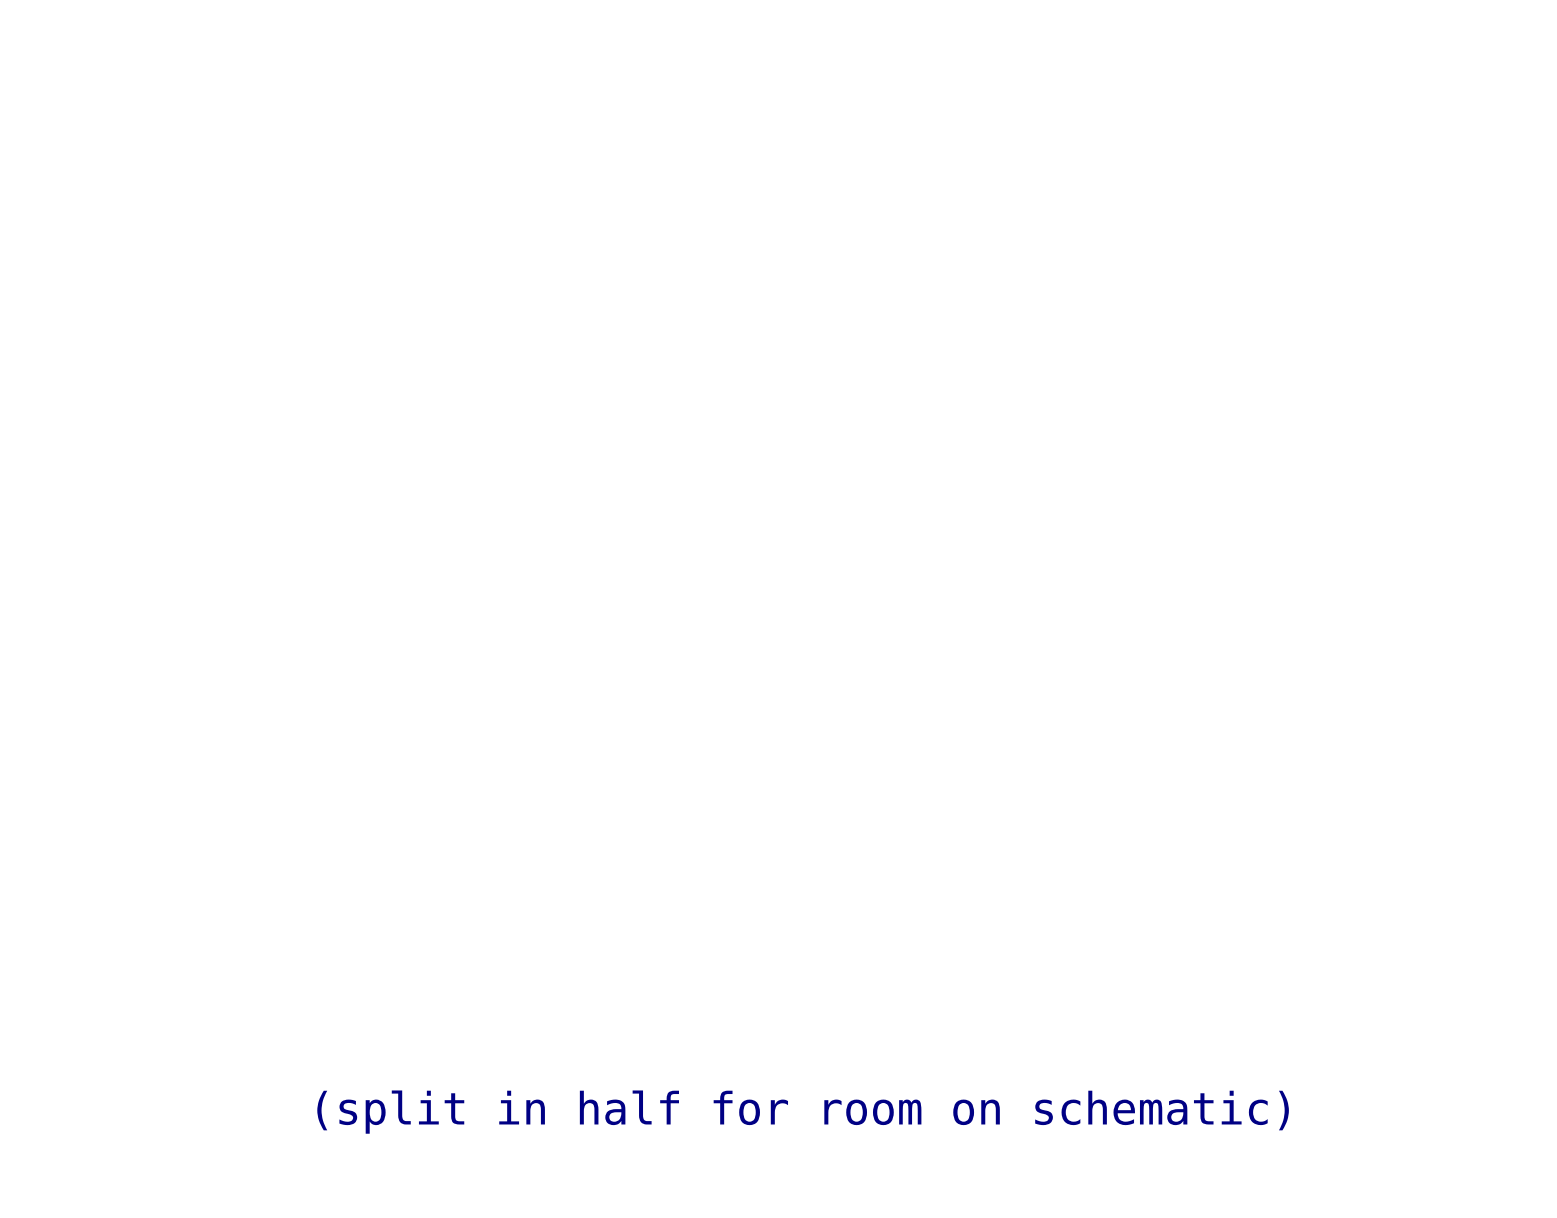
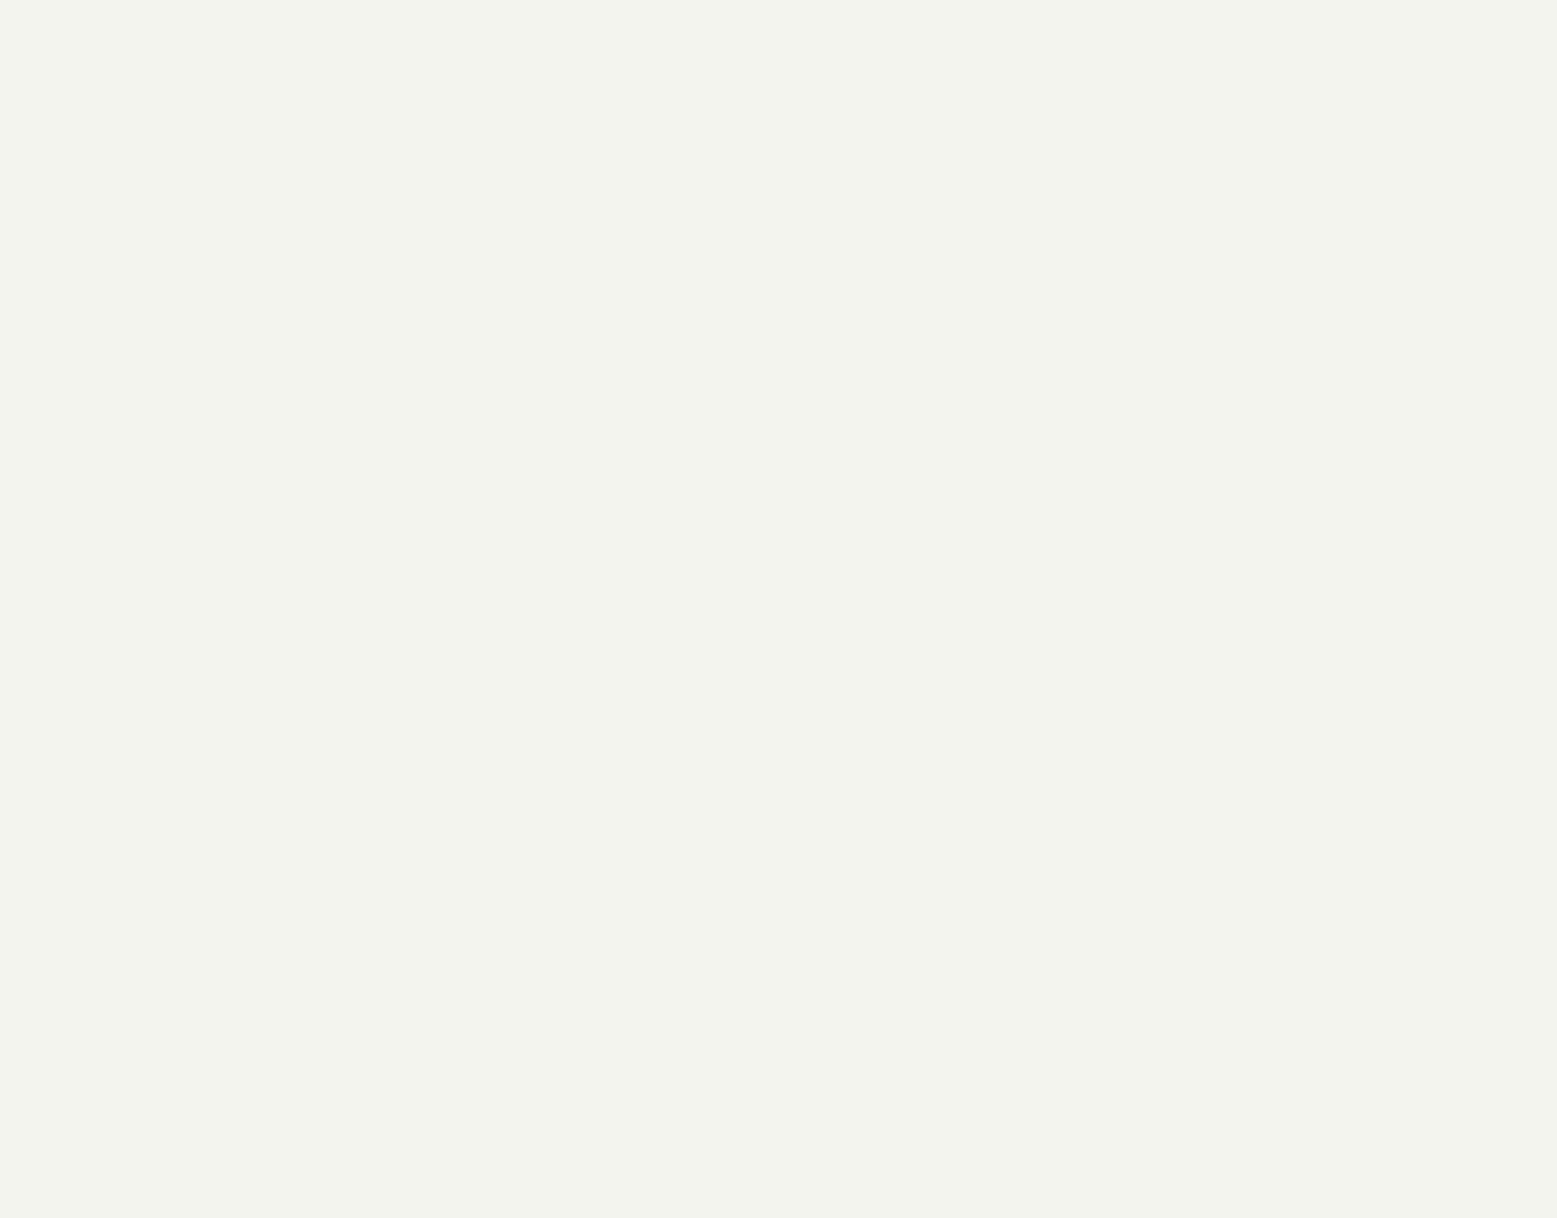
text: (split in half for room on schematic) (803, 1112) -> none

